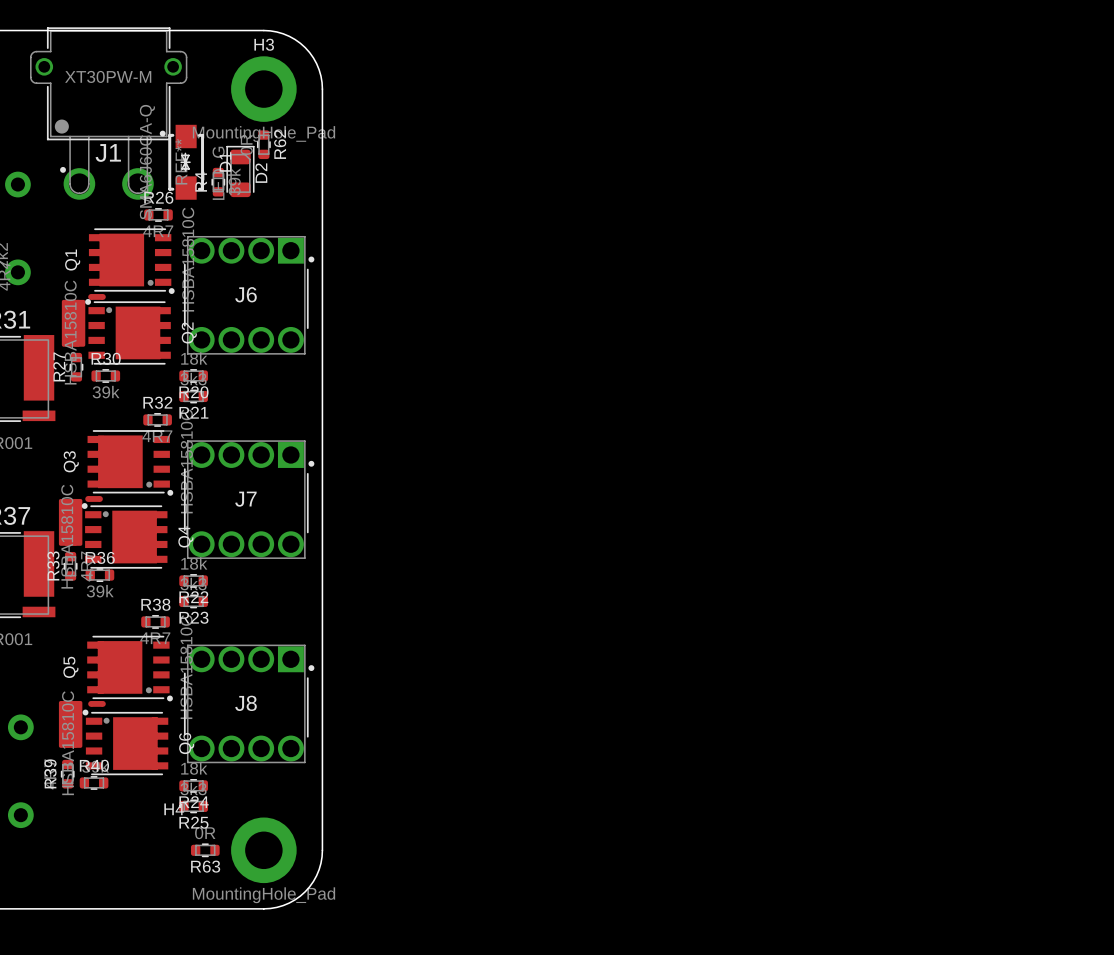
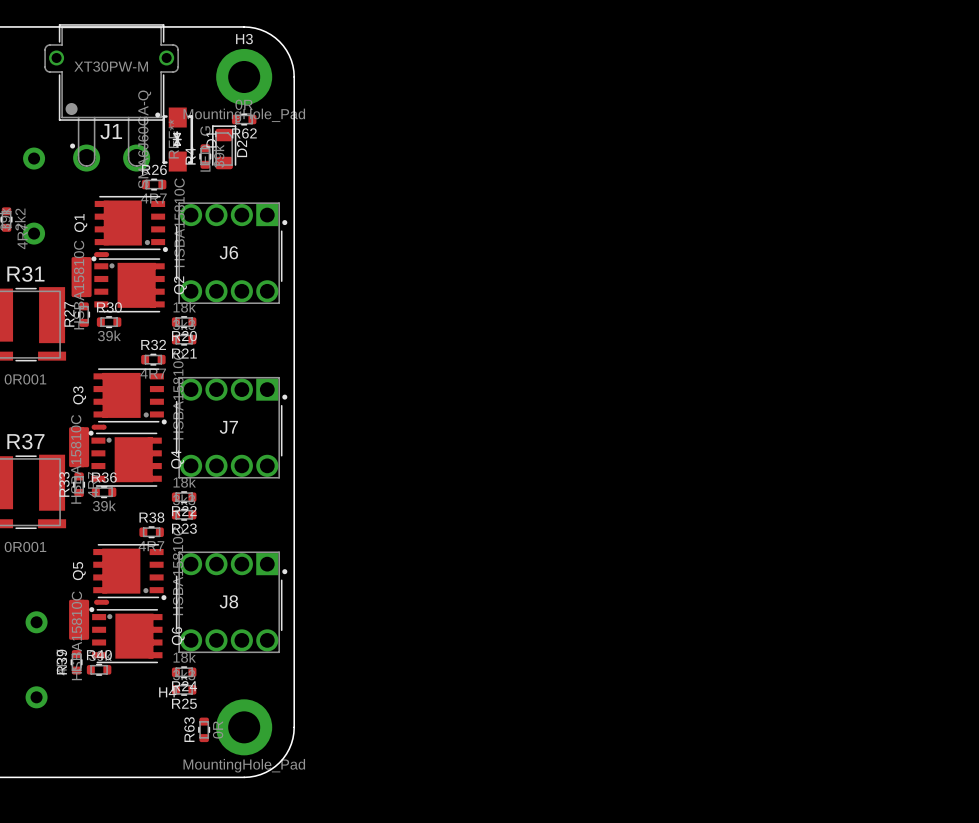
R62 rotation: 0° (263, 144) -> 90° clockwise (244, 119)
R63 rotation: 0° (205, 850) -> 90° clockwise (204, 729)

